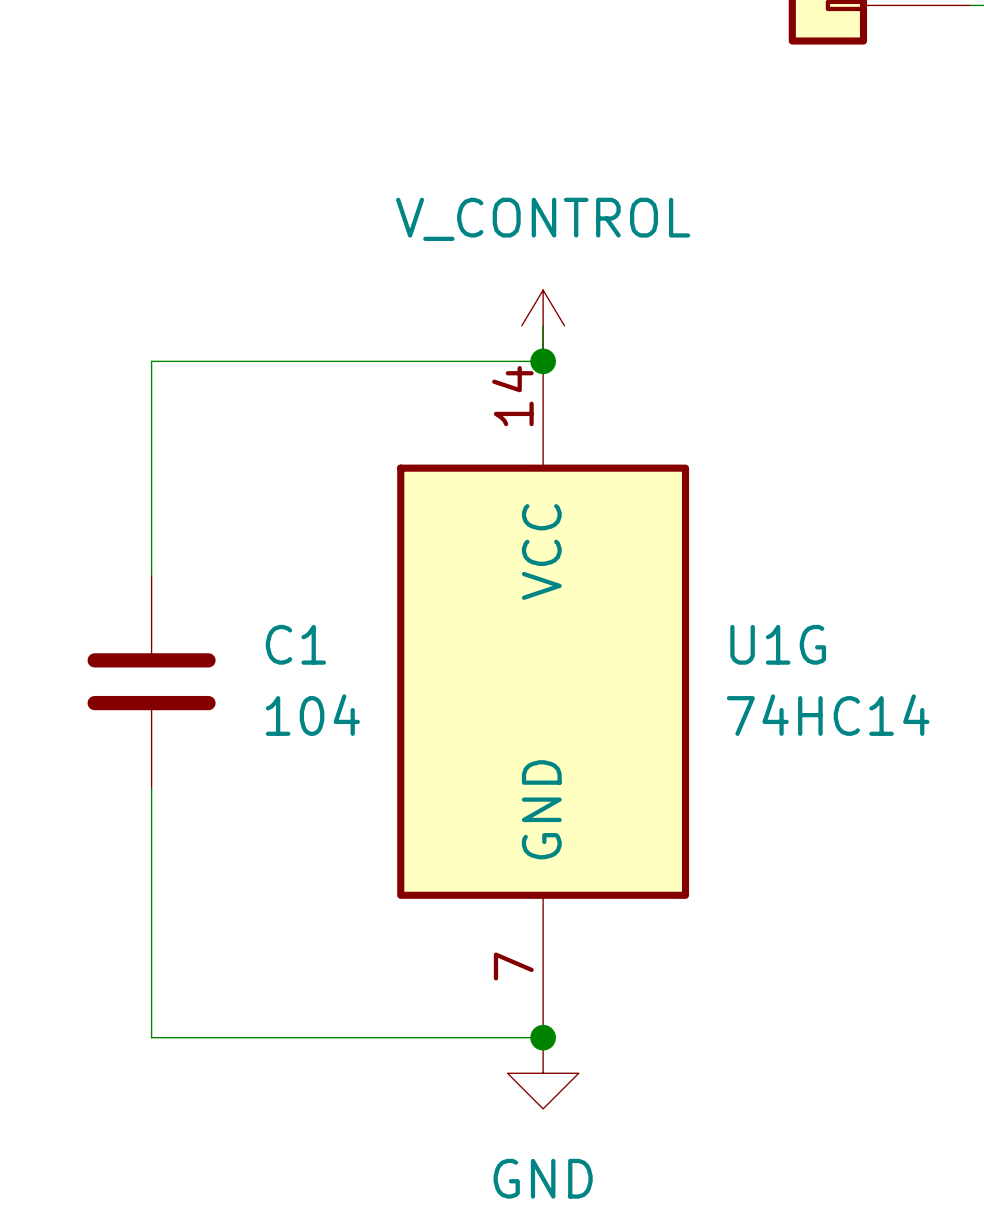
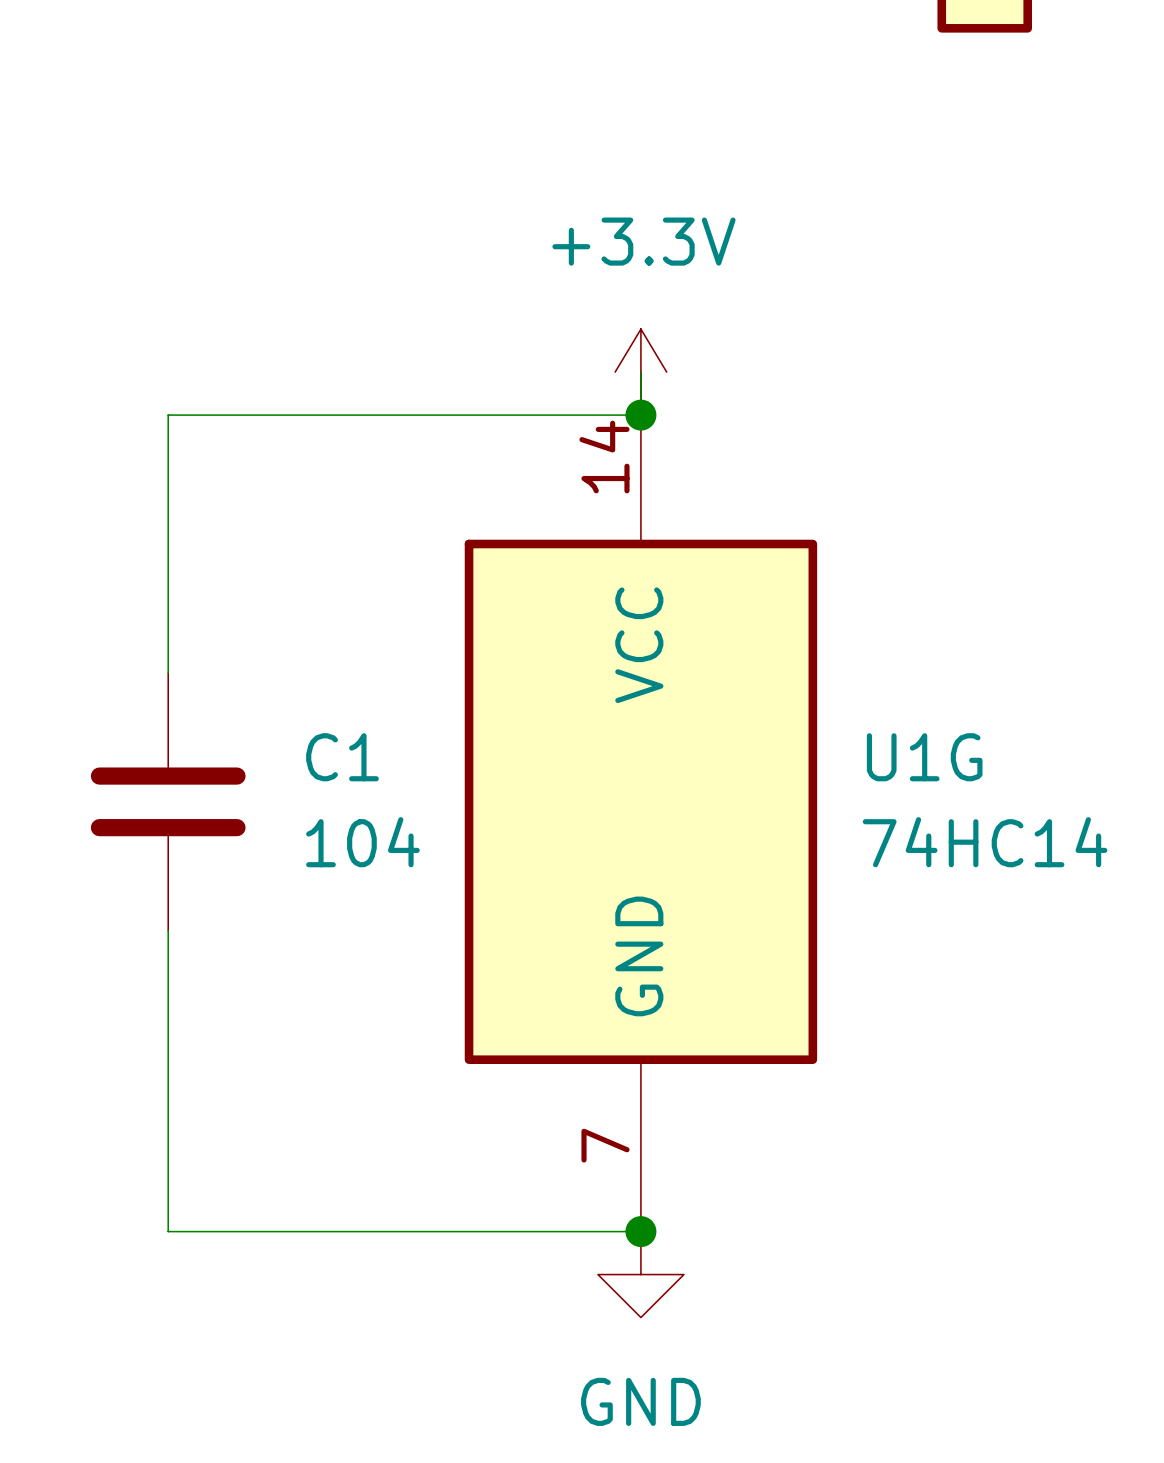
power symbol: V_CONTROL (543, 325) -> +3.3V (640, 372)

